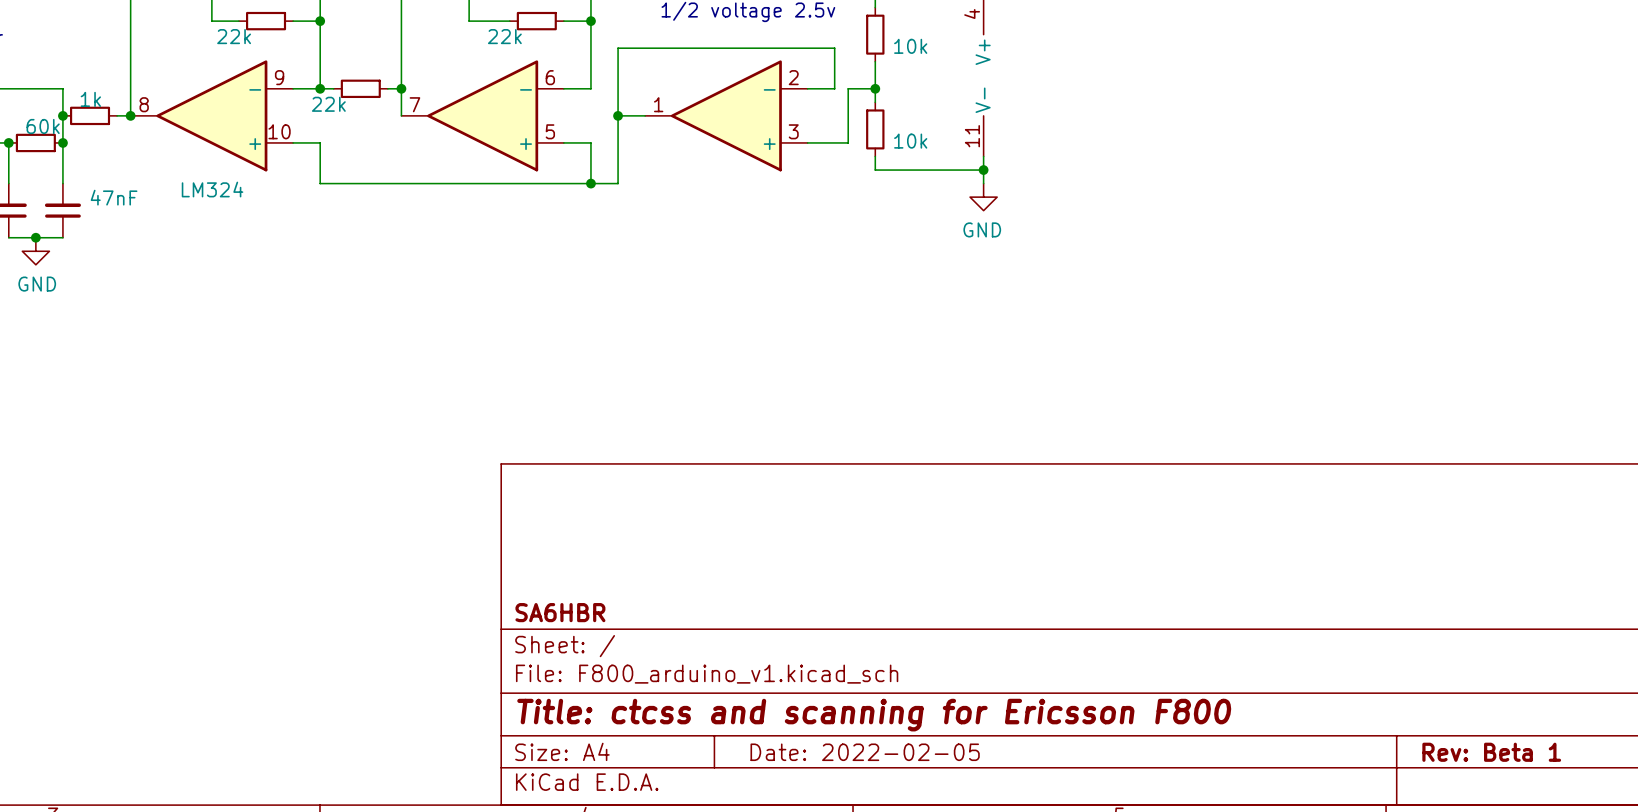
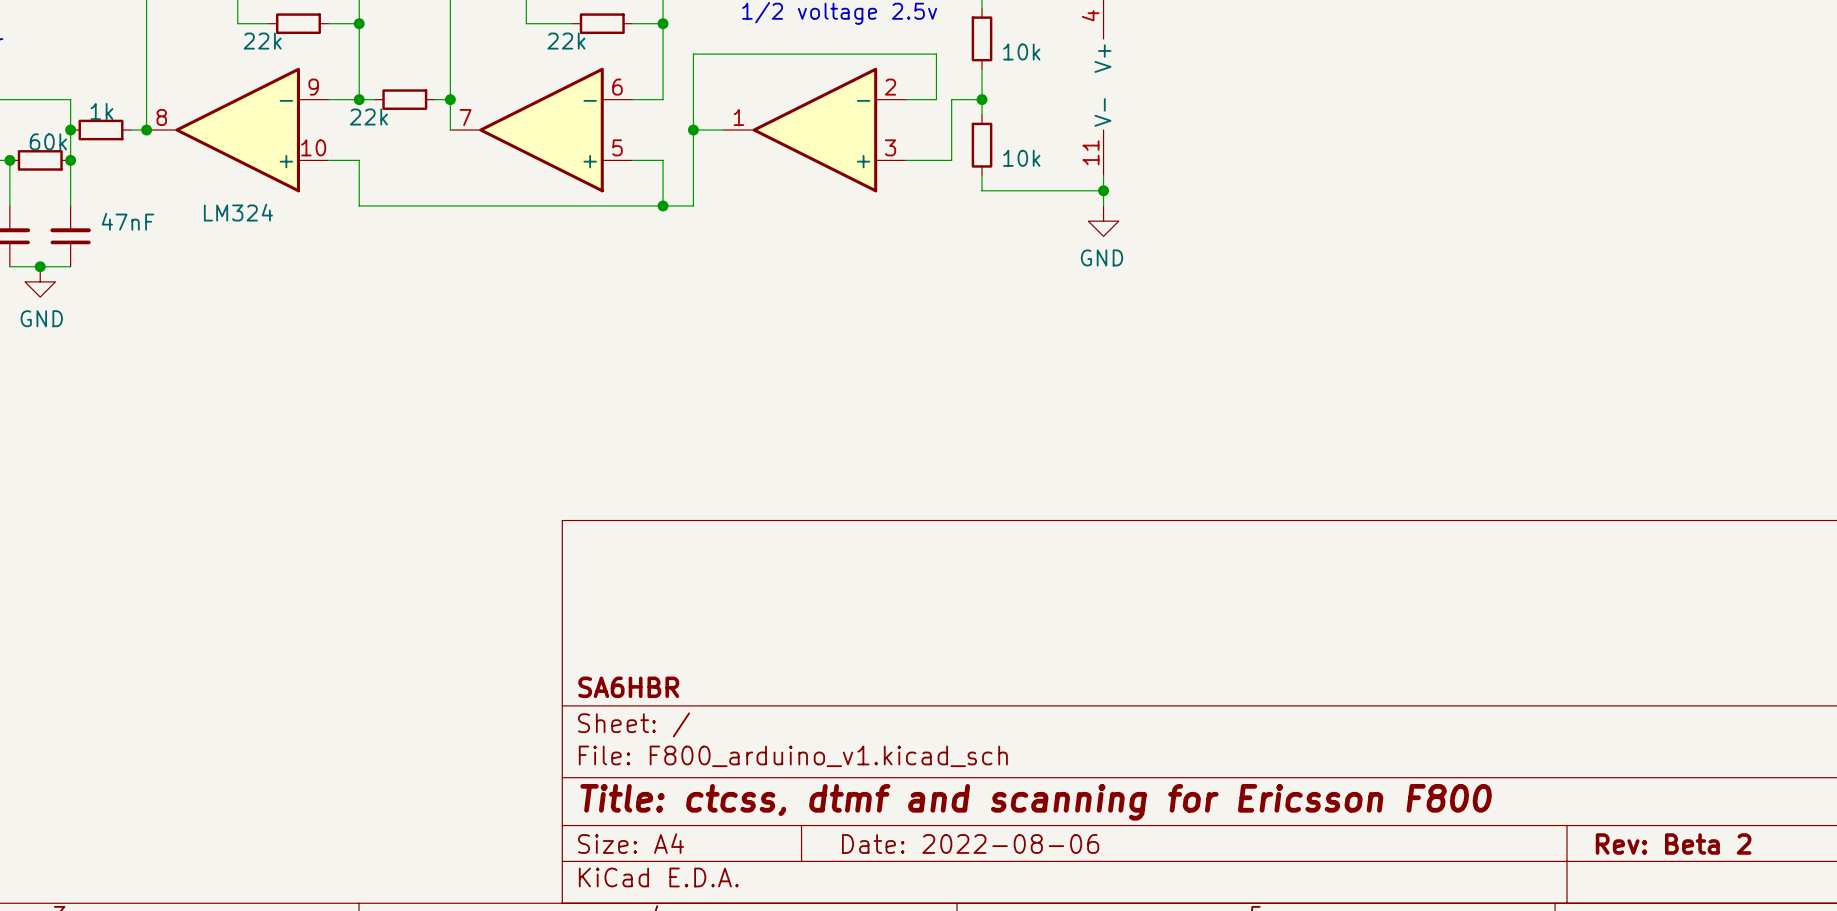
title block: Title: ctcss and scanning for Ericsson F800 (874, 715) -> Title: ctcss, dtmf and scanning for Ericsson F800 (1036, 802)
title block: Date: 2022-02-05 (865, 752) -> Date: 2022-08-06 (970, 843)
title block: Rev: Beta 1 (1491, 752) -> Rev: Beta 2 (1673, 843)

